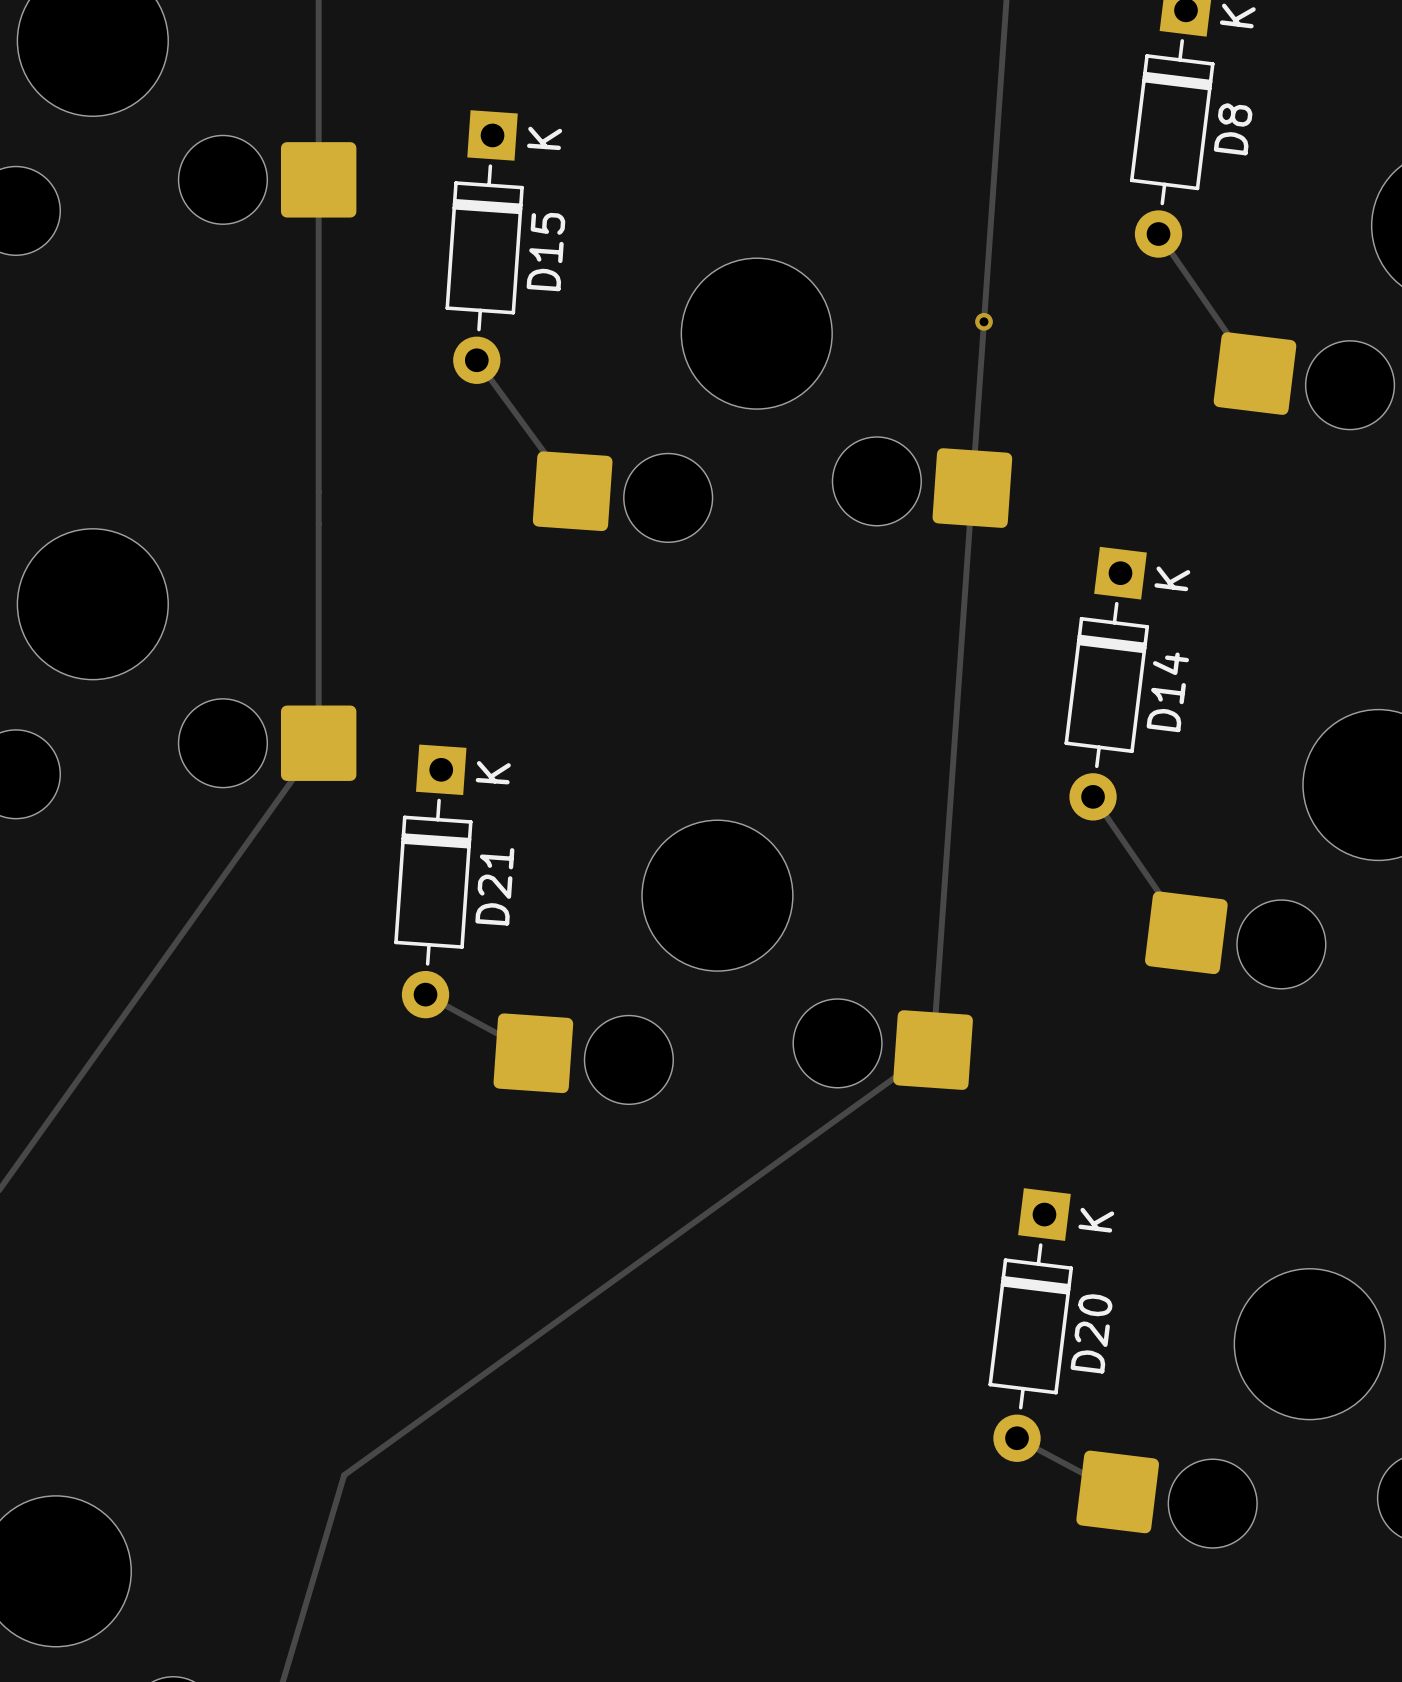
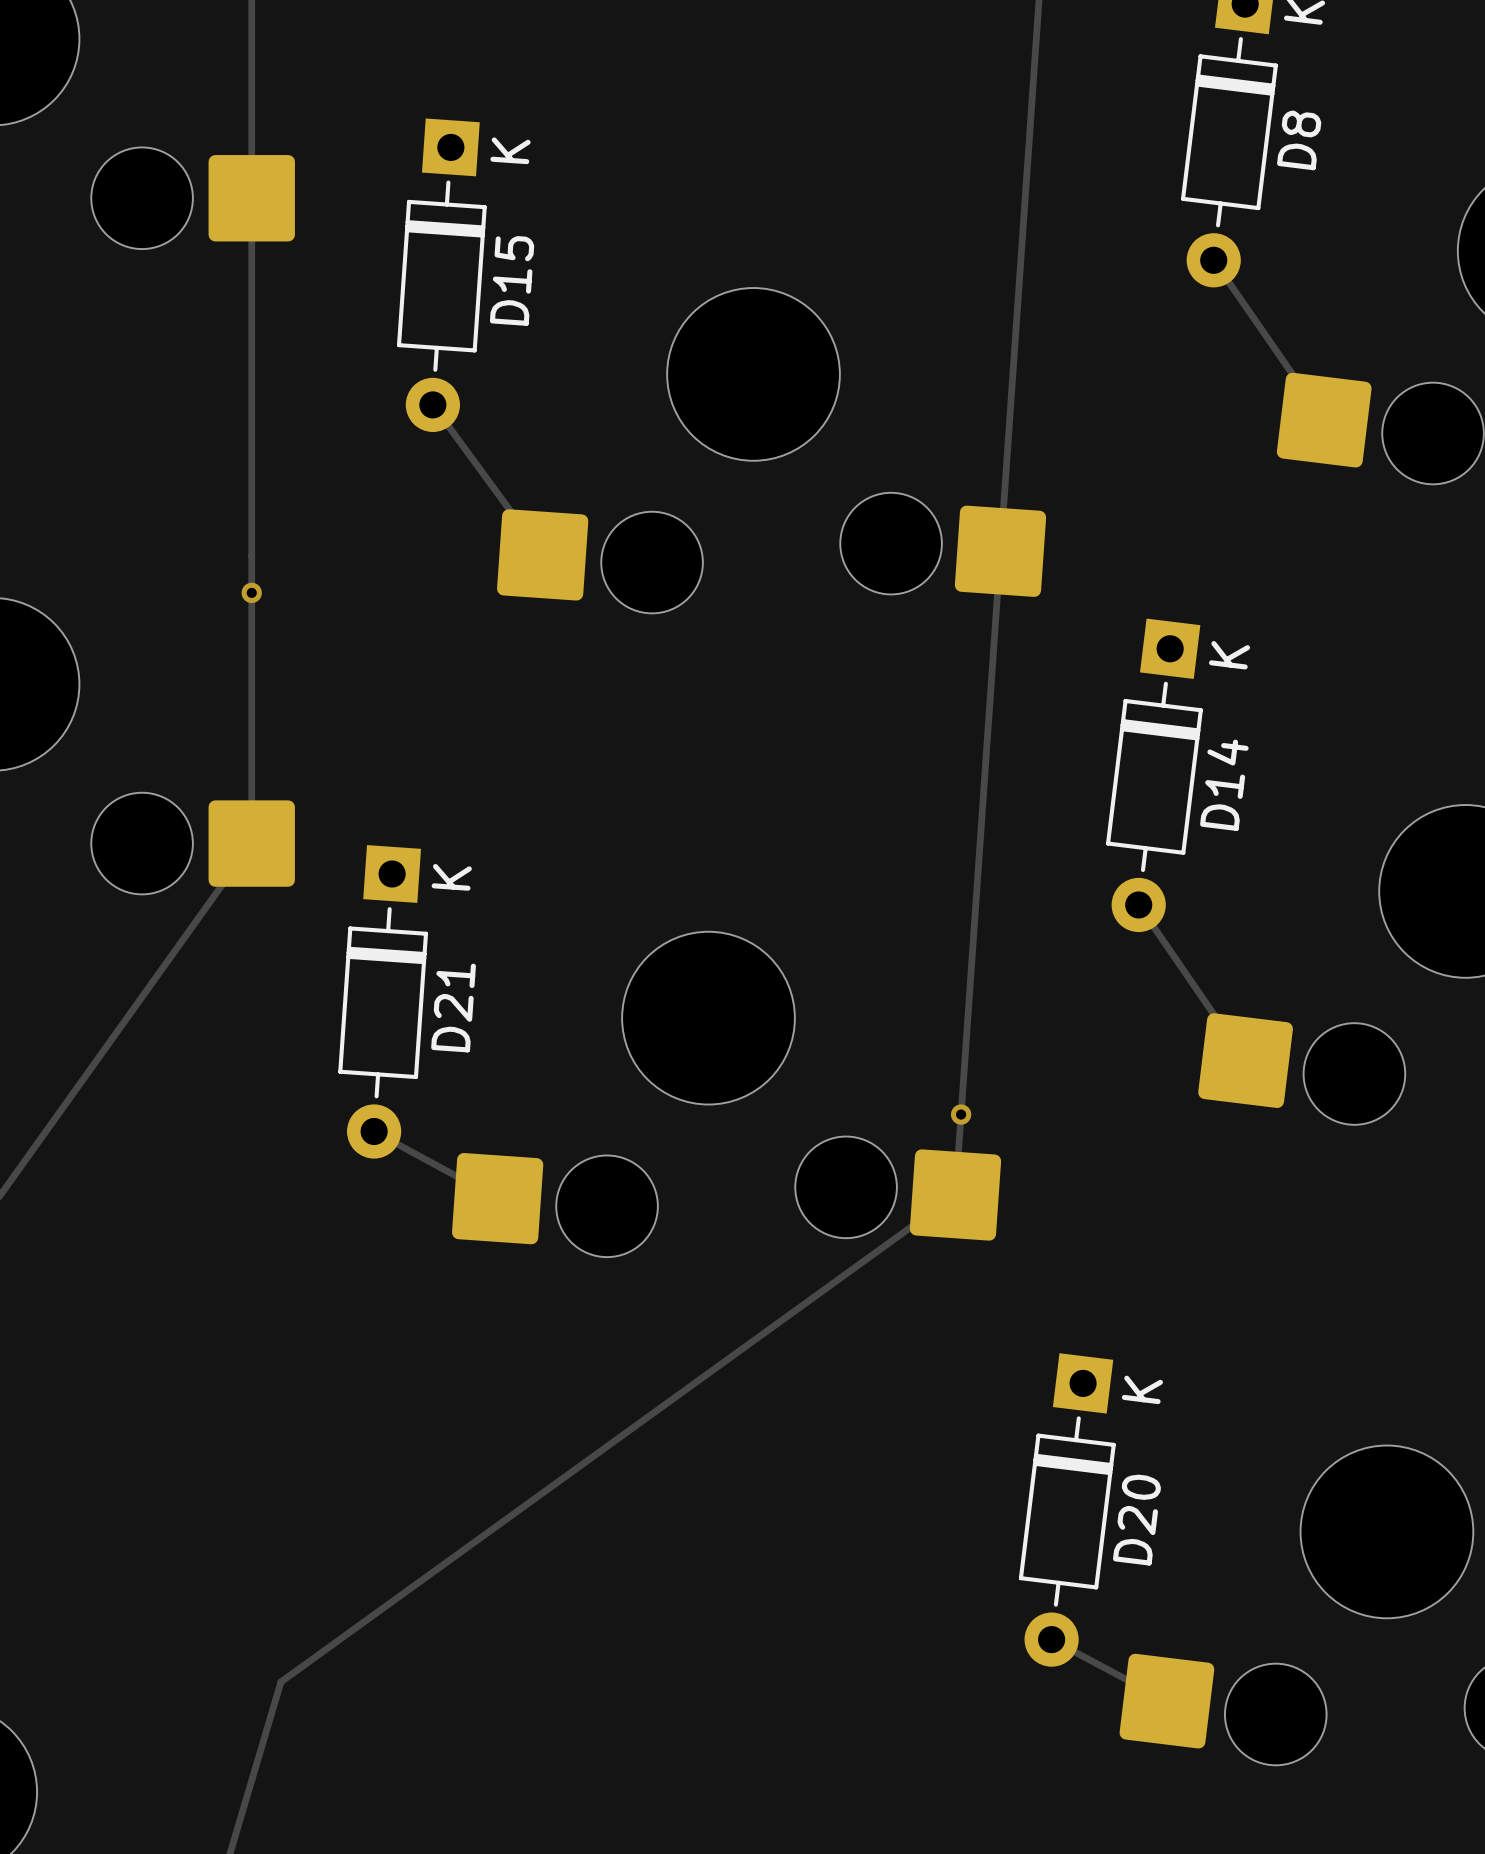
via: (984, 321) -> none
via: none -> (251, 592)
via: none -> (961, 1114)

